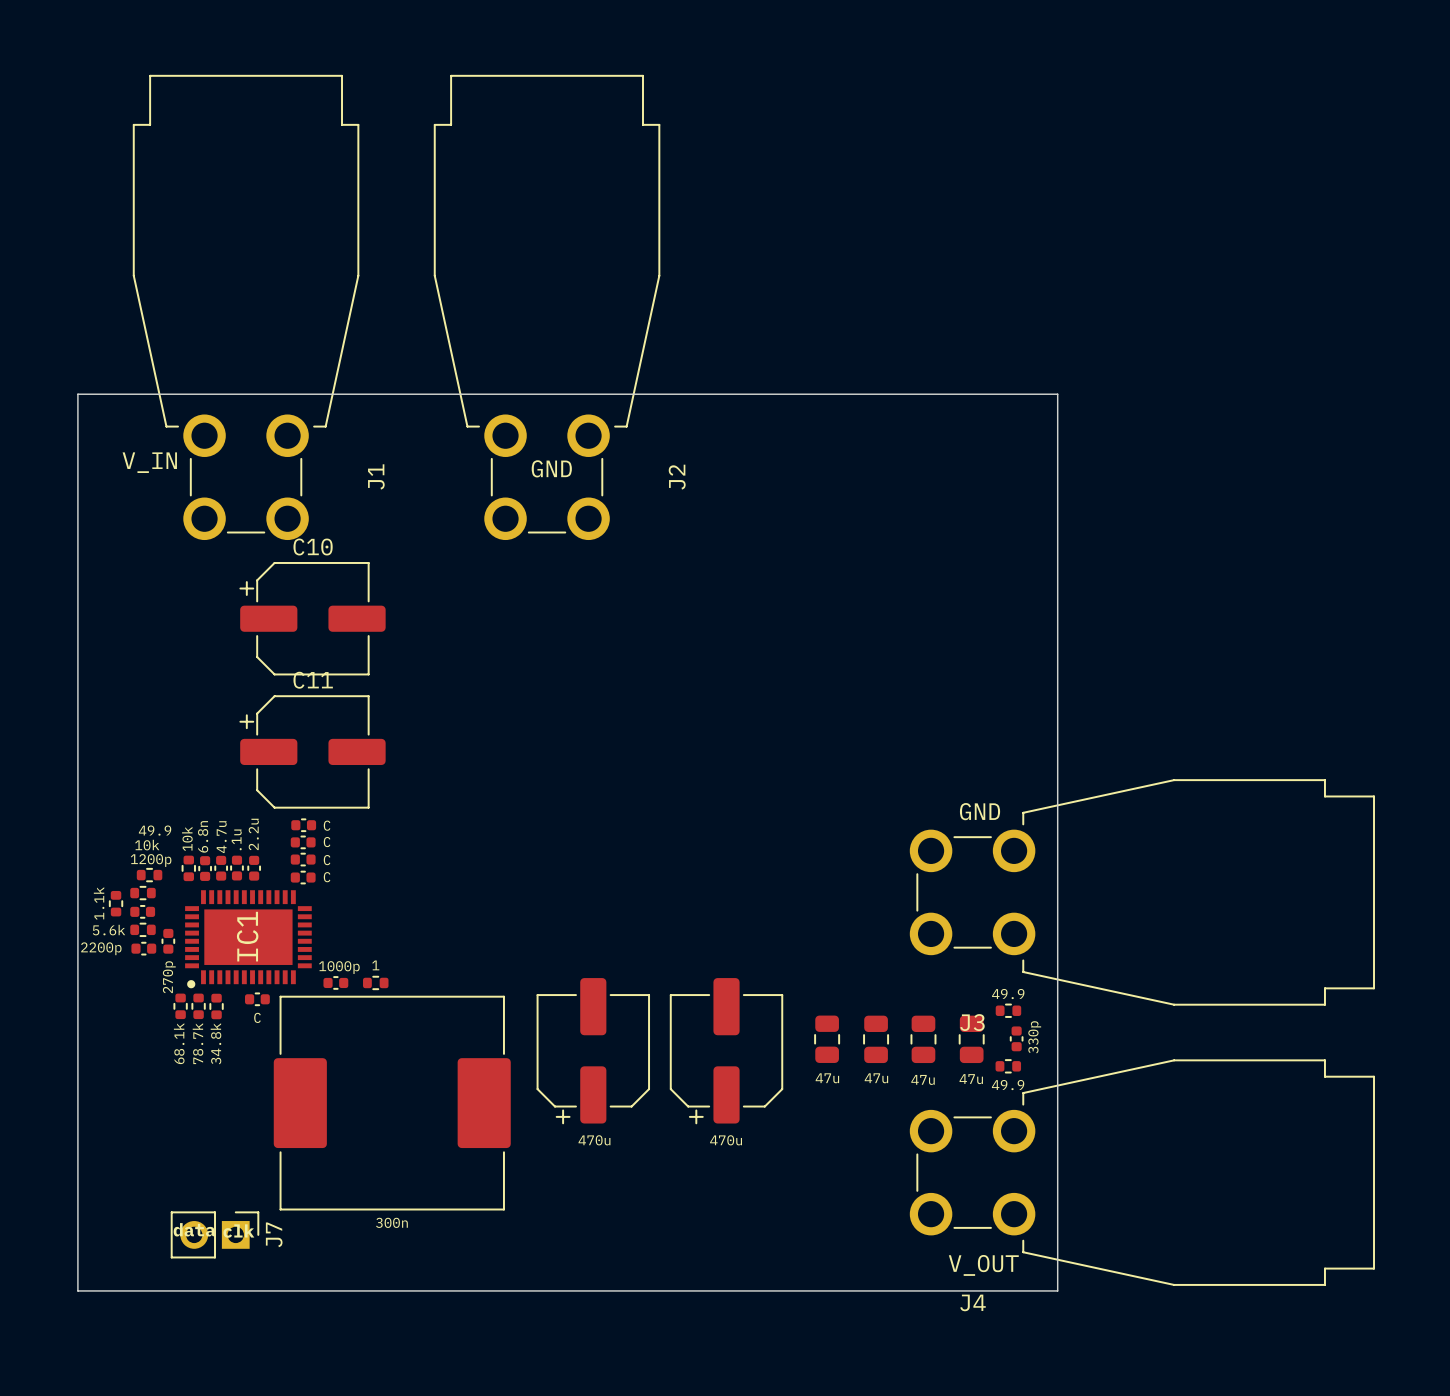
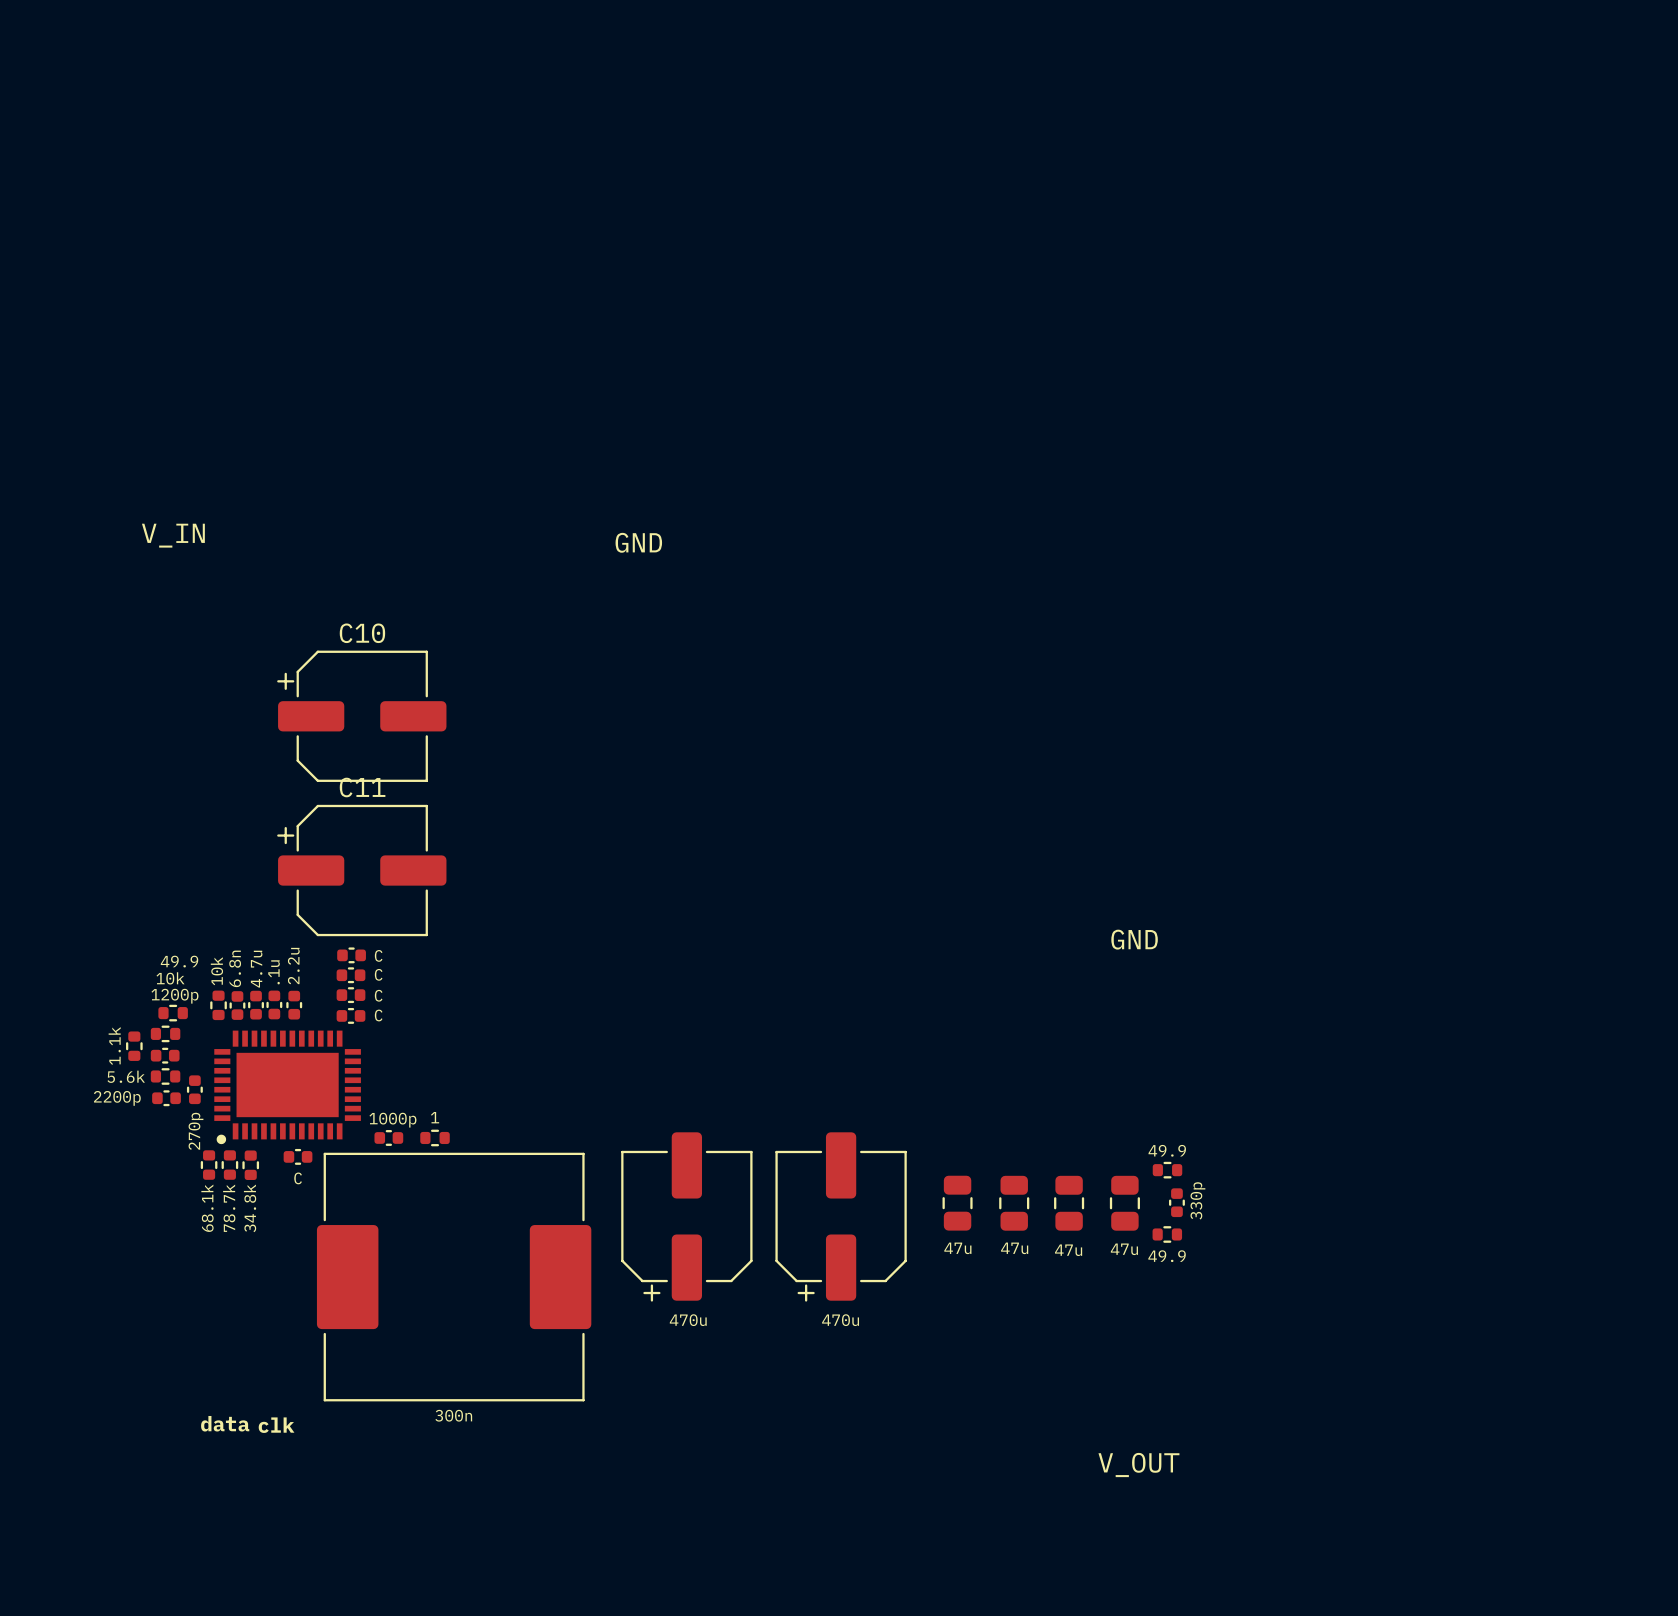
J1: (246, 307) -> none
J2: (547, 307) -> none
board edge: (77, 394) (1057, 394) (1057, 1290) (77, 1290) (77, 394) -> none
J3: (1142, 892) -> none
IC1 name: IC1 (247, 936) -> none
J4: (1142, 1172) -> none
J7: (215, 1234) -> none

